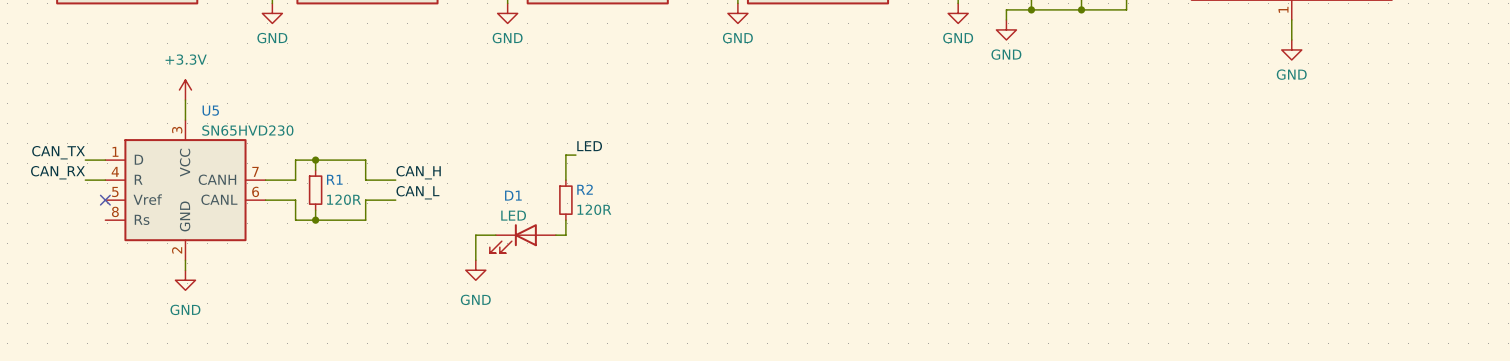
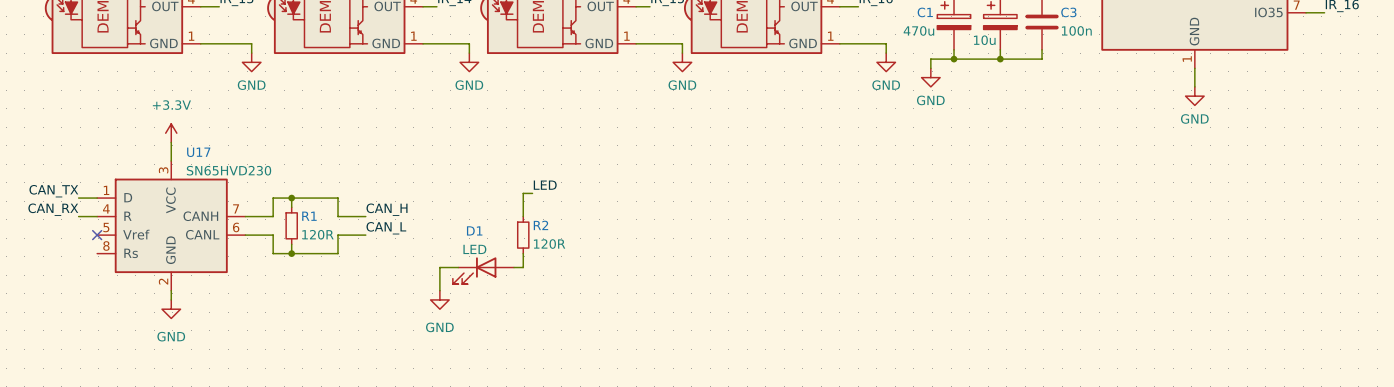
U5 name: U5 (210, 110) -> U17 (198, 152)

